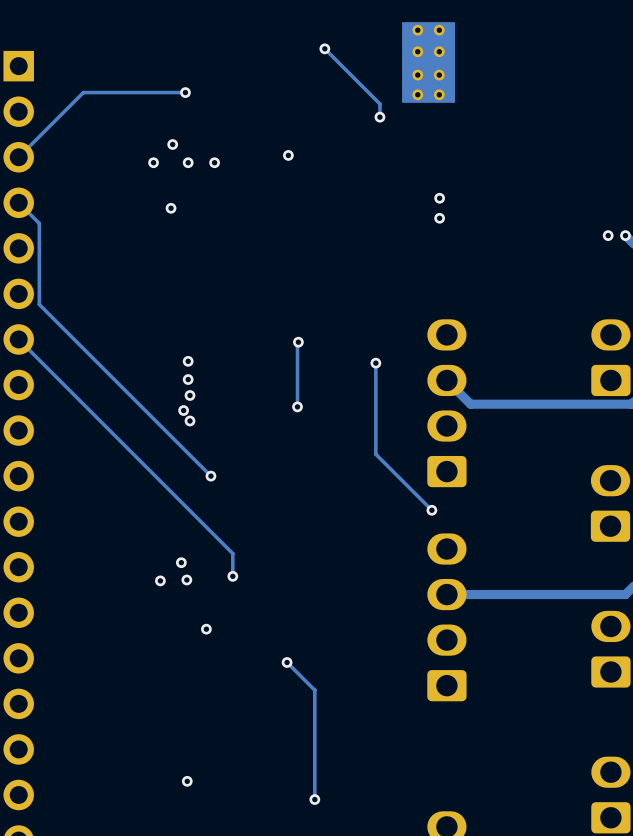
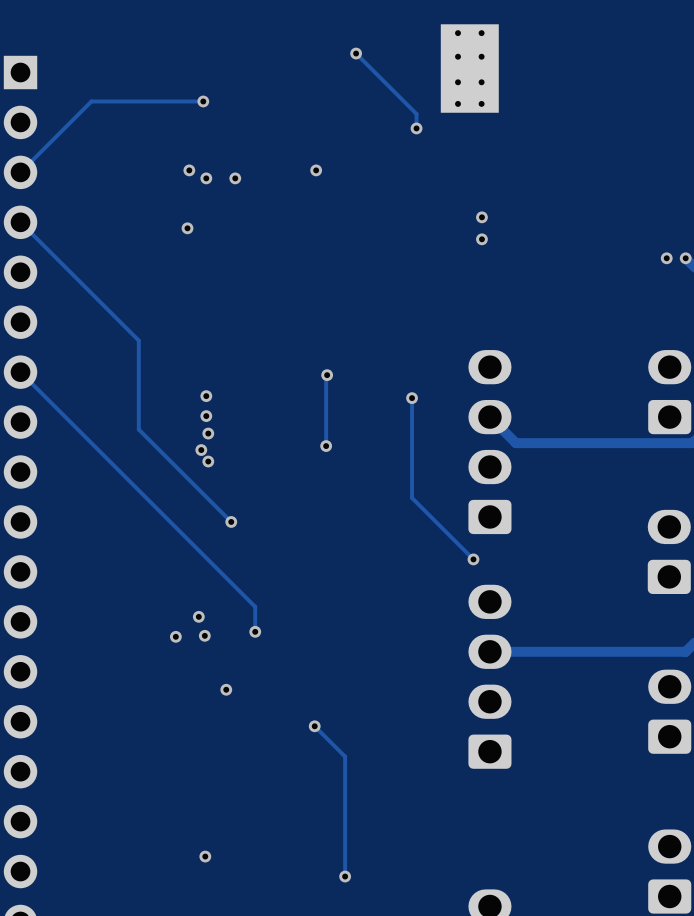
via: (172, 144) -> none
via: none -> (189, 170)
via: (153, 162) -> none
track: (39, 223) (39, 304) (126, 391) -> (43, 244) (138, 340) (138, 429)

